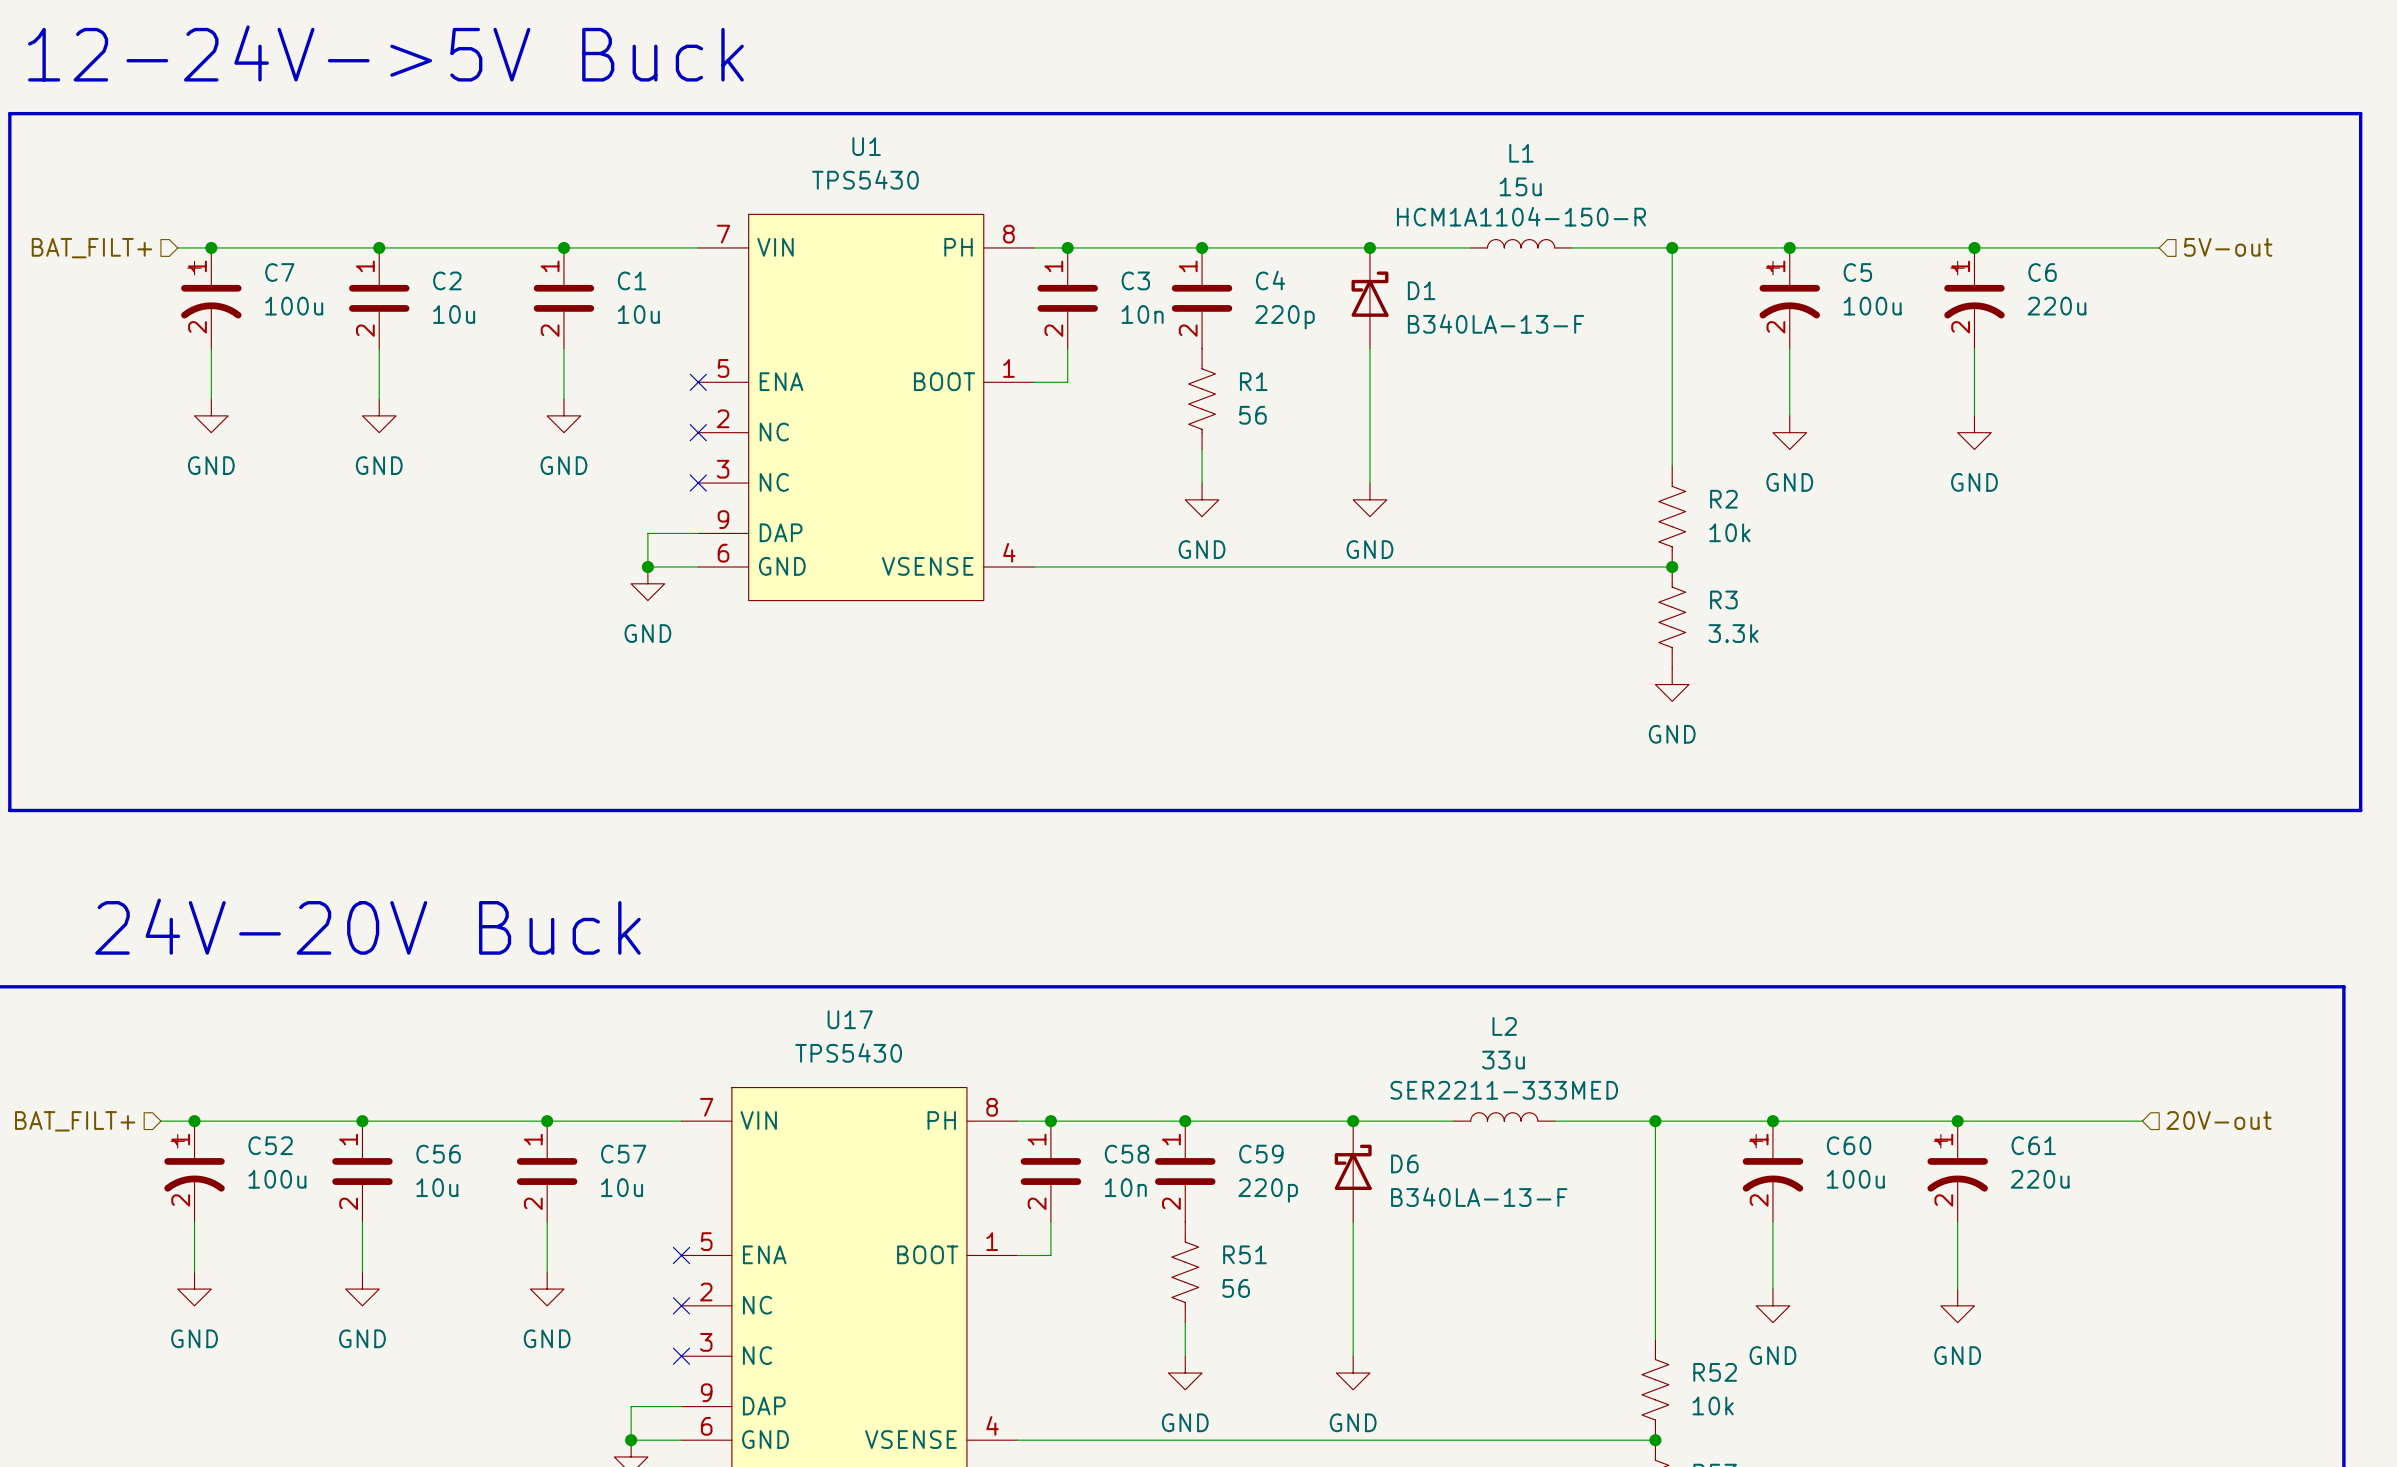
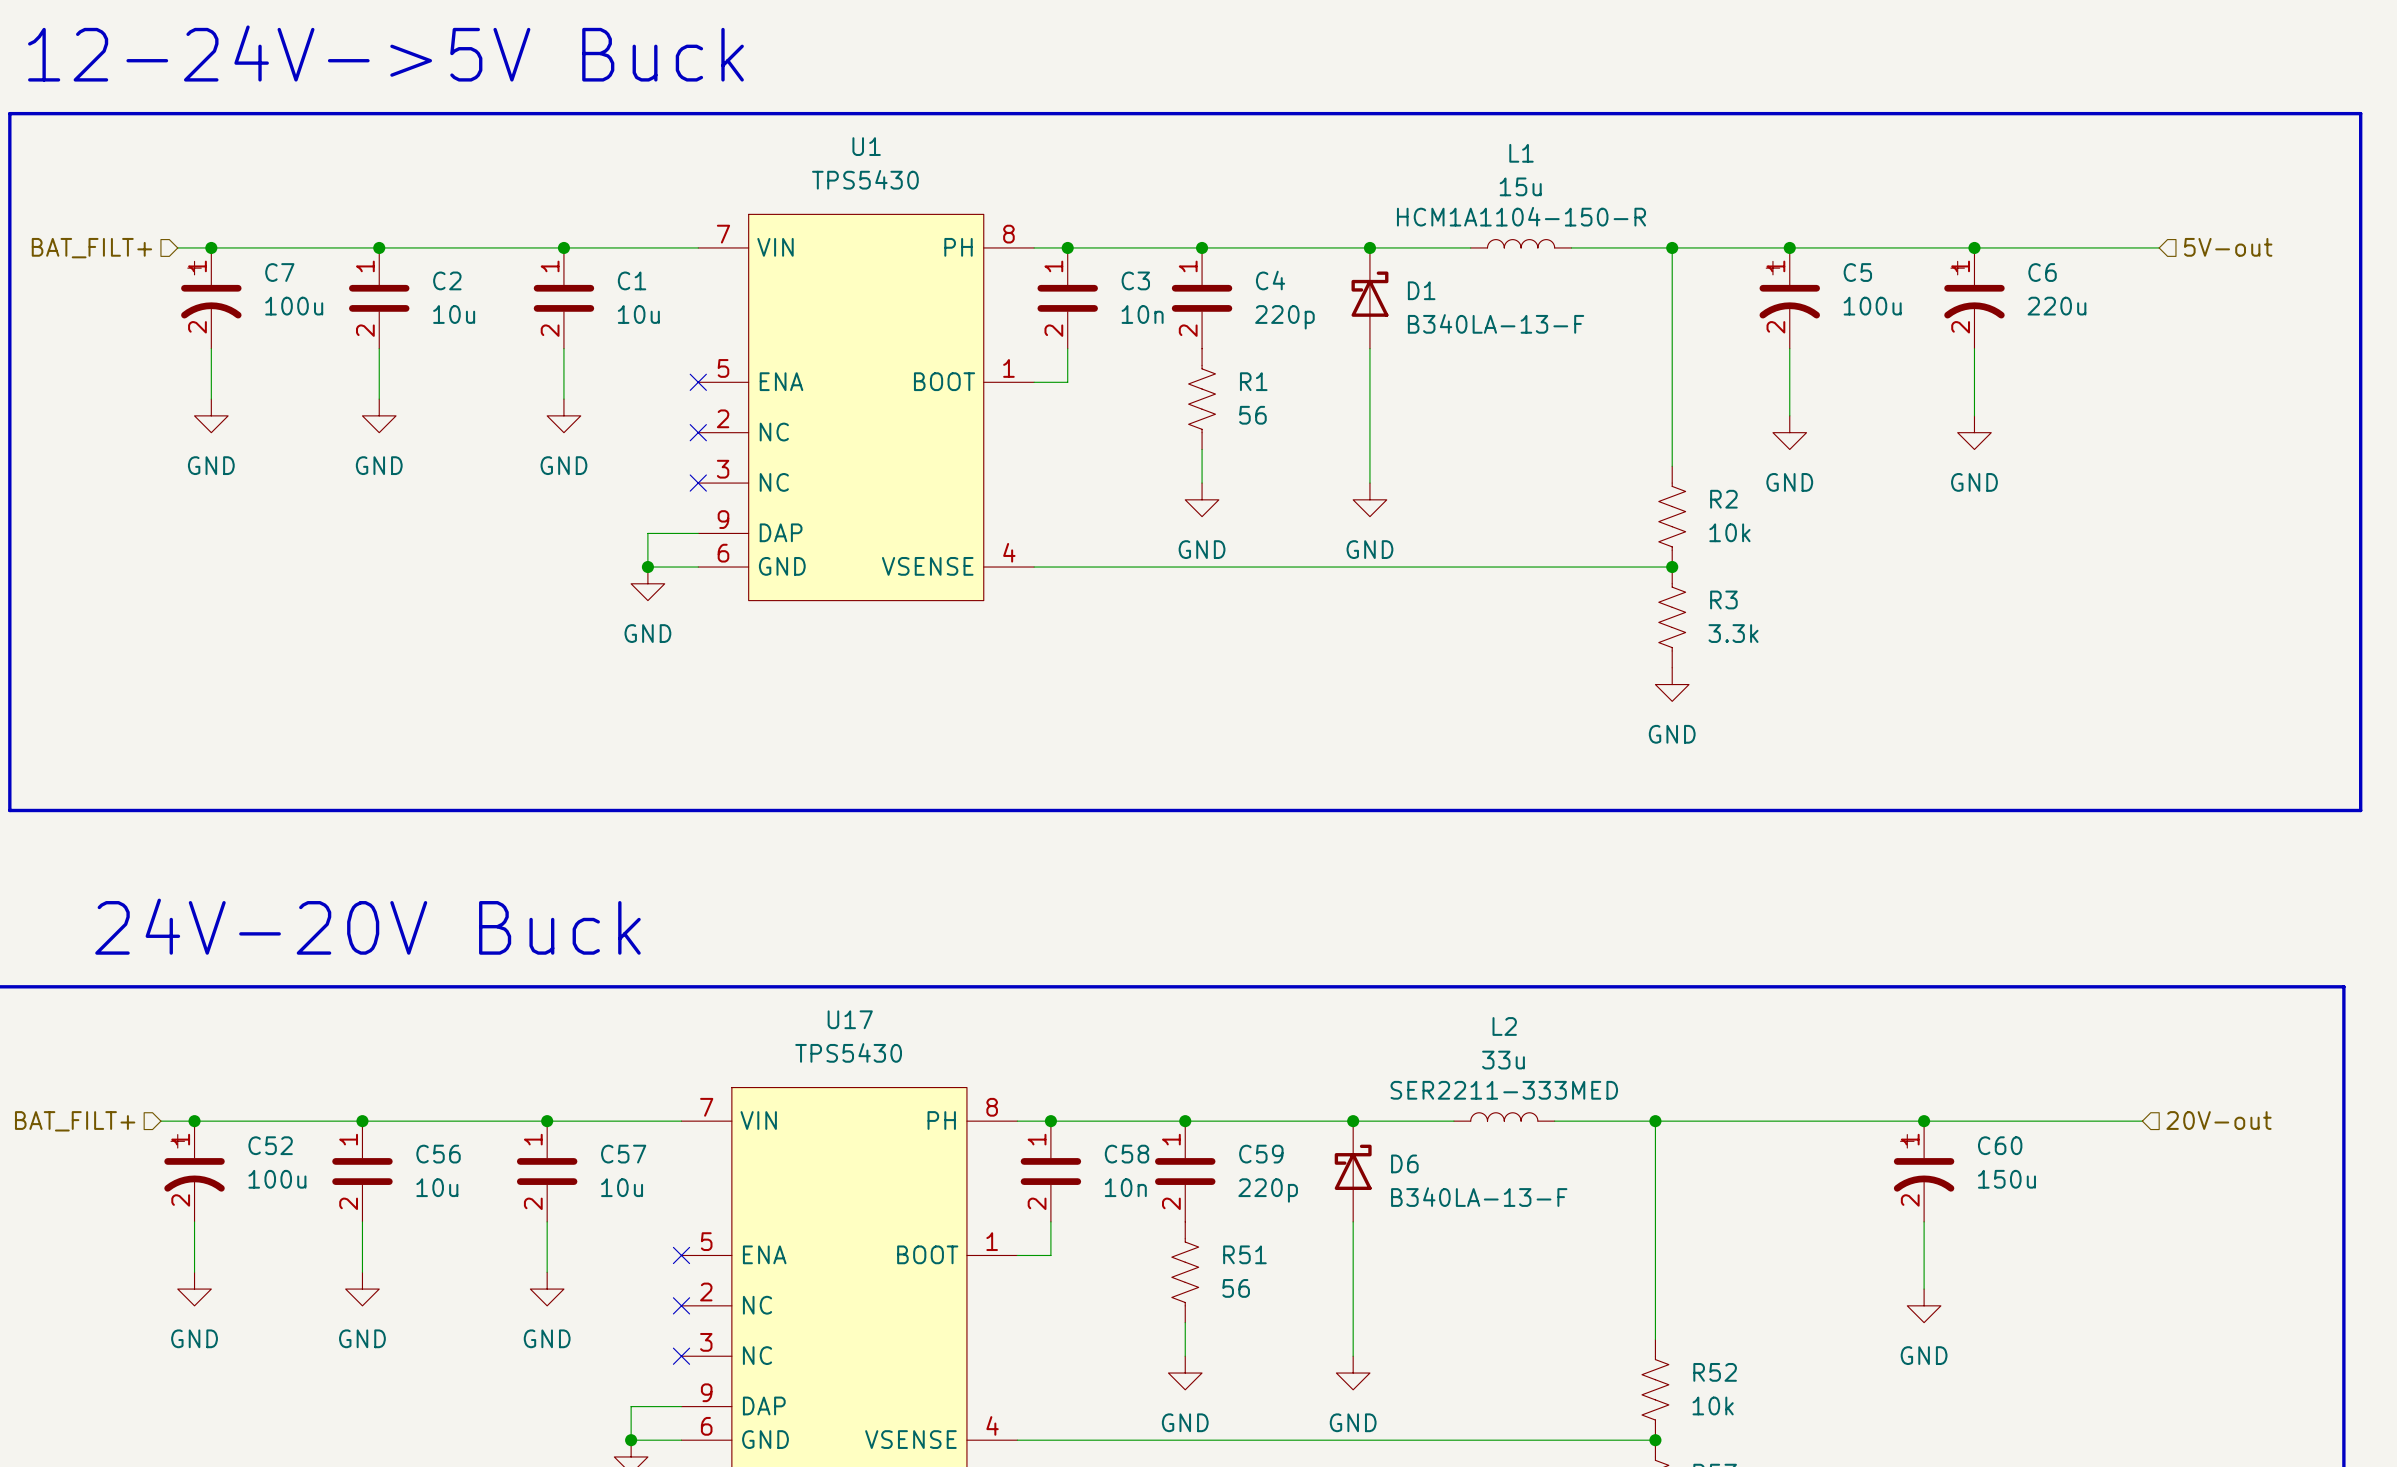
junction: (1772, 1121) -> none
junction position: (1957, 1121) -> (1924, 1121)
C60 position: (1772, 1171) -> (1924, 1171)
C61: 220u (1957, 1171) -> none
C60 value: 100u (1855, 1179) -> 150u (2006, 1179)
wire: (1772, 1221) (1772, 1289) -> none
wire: (1957, 1221) (1957, 1289) -> (1924, 1221) (1924, 1289)
power symbol: GND (1772, 1305) -> none
power symbol position: GND (1957, 1305) -> GND (1924, 1305)

